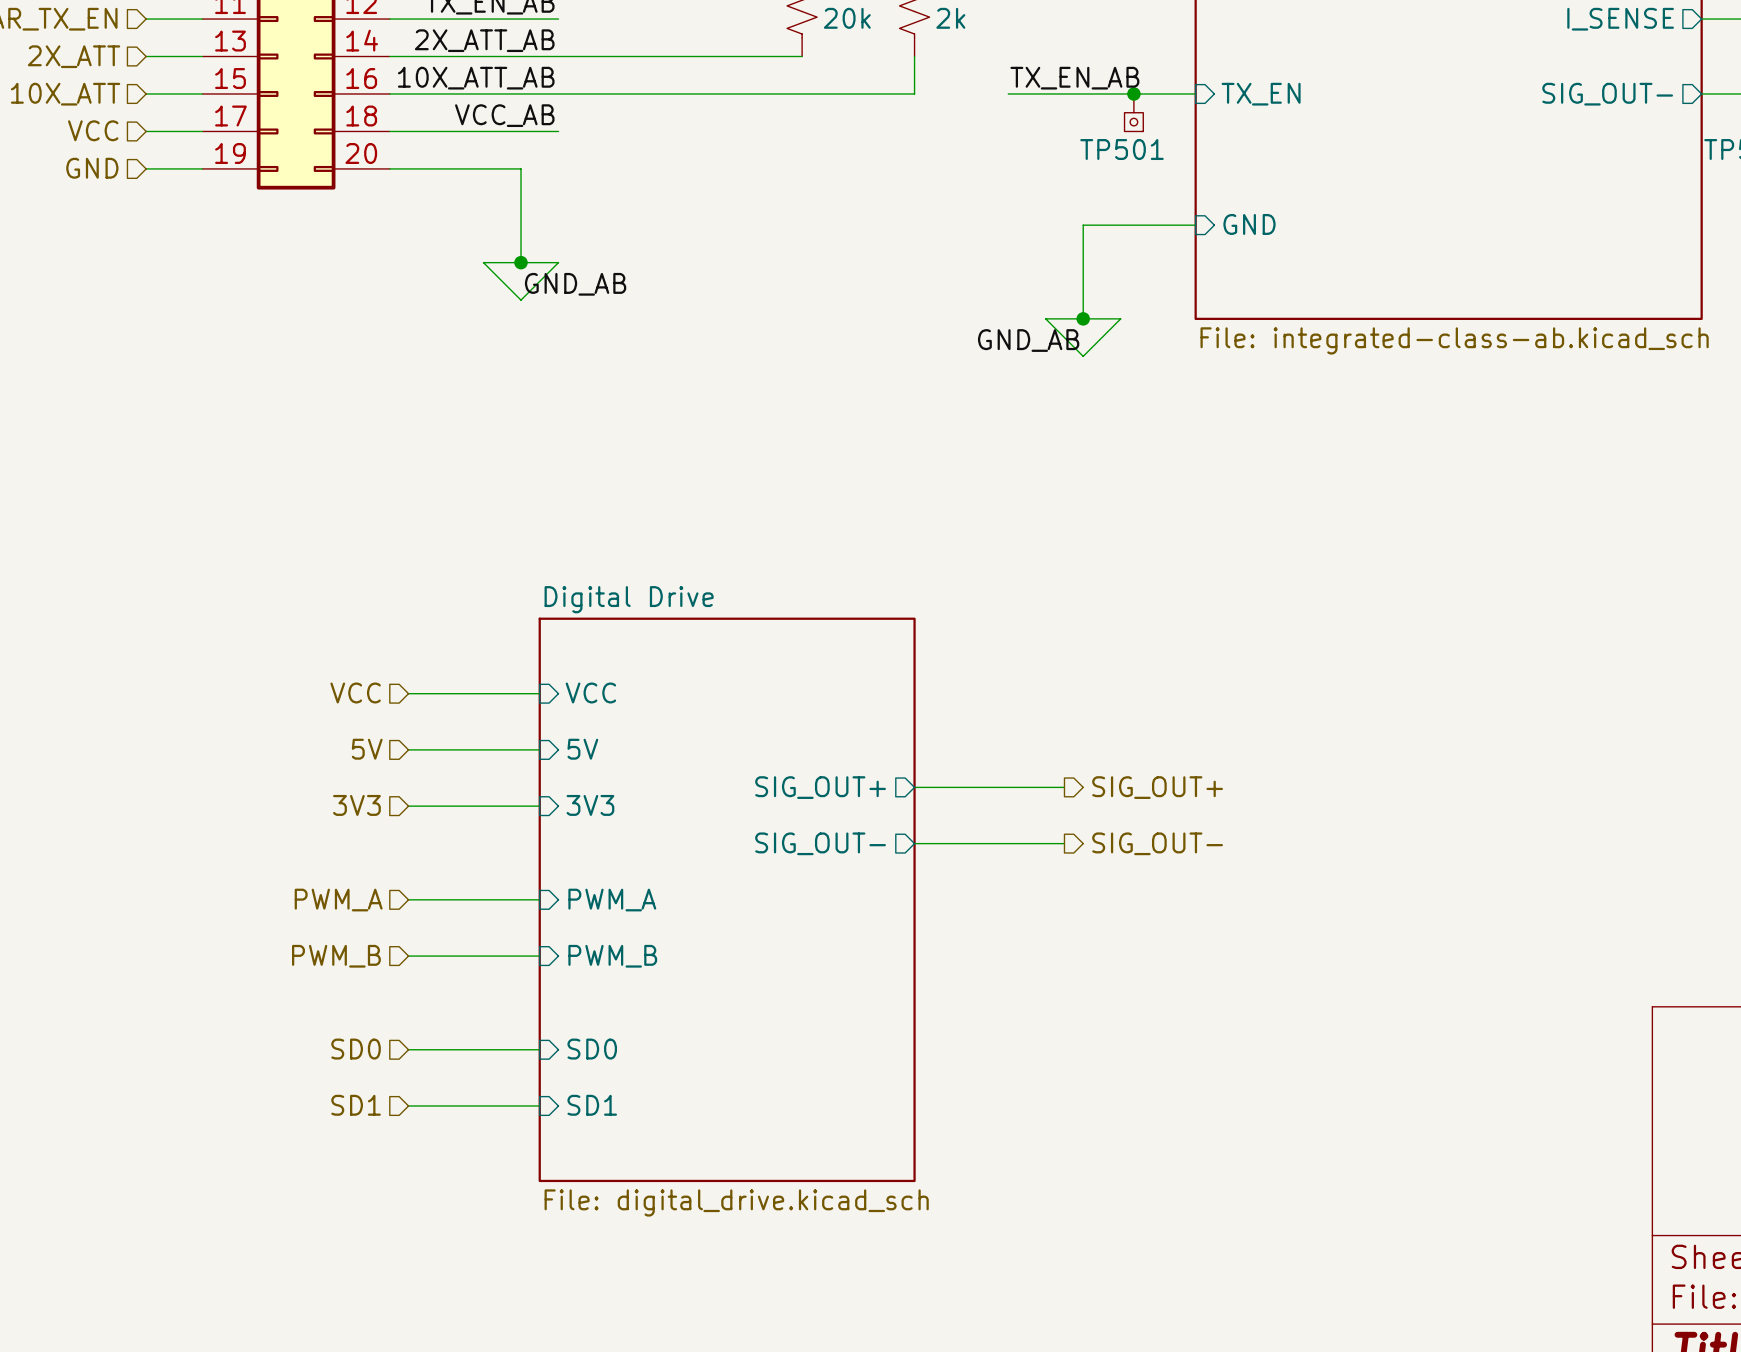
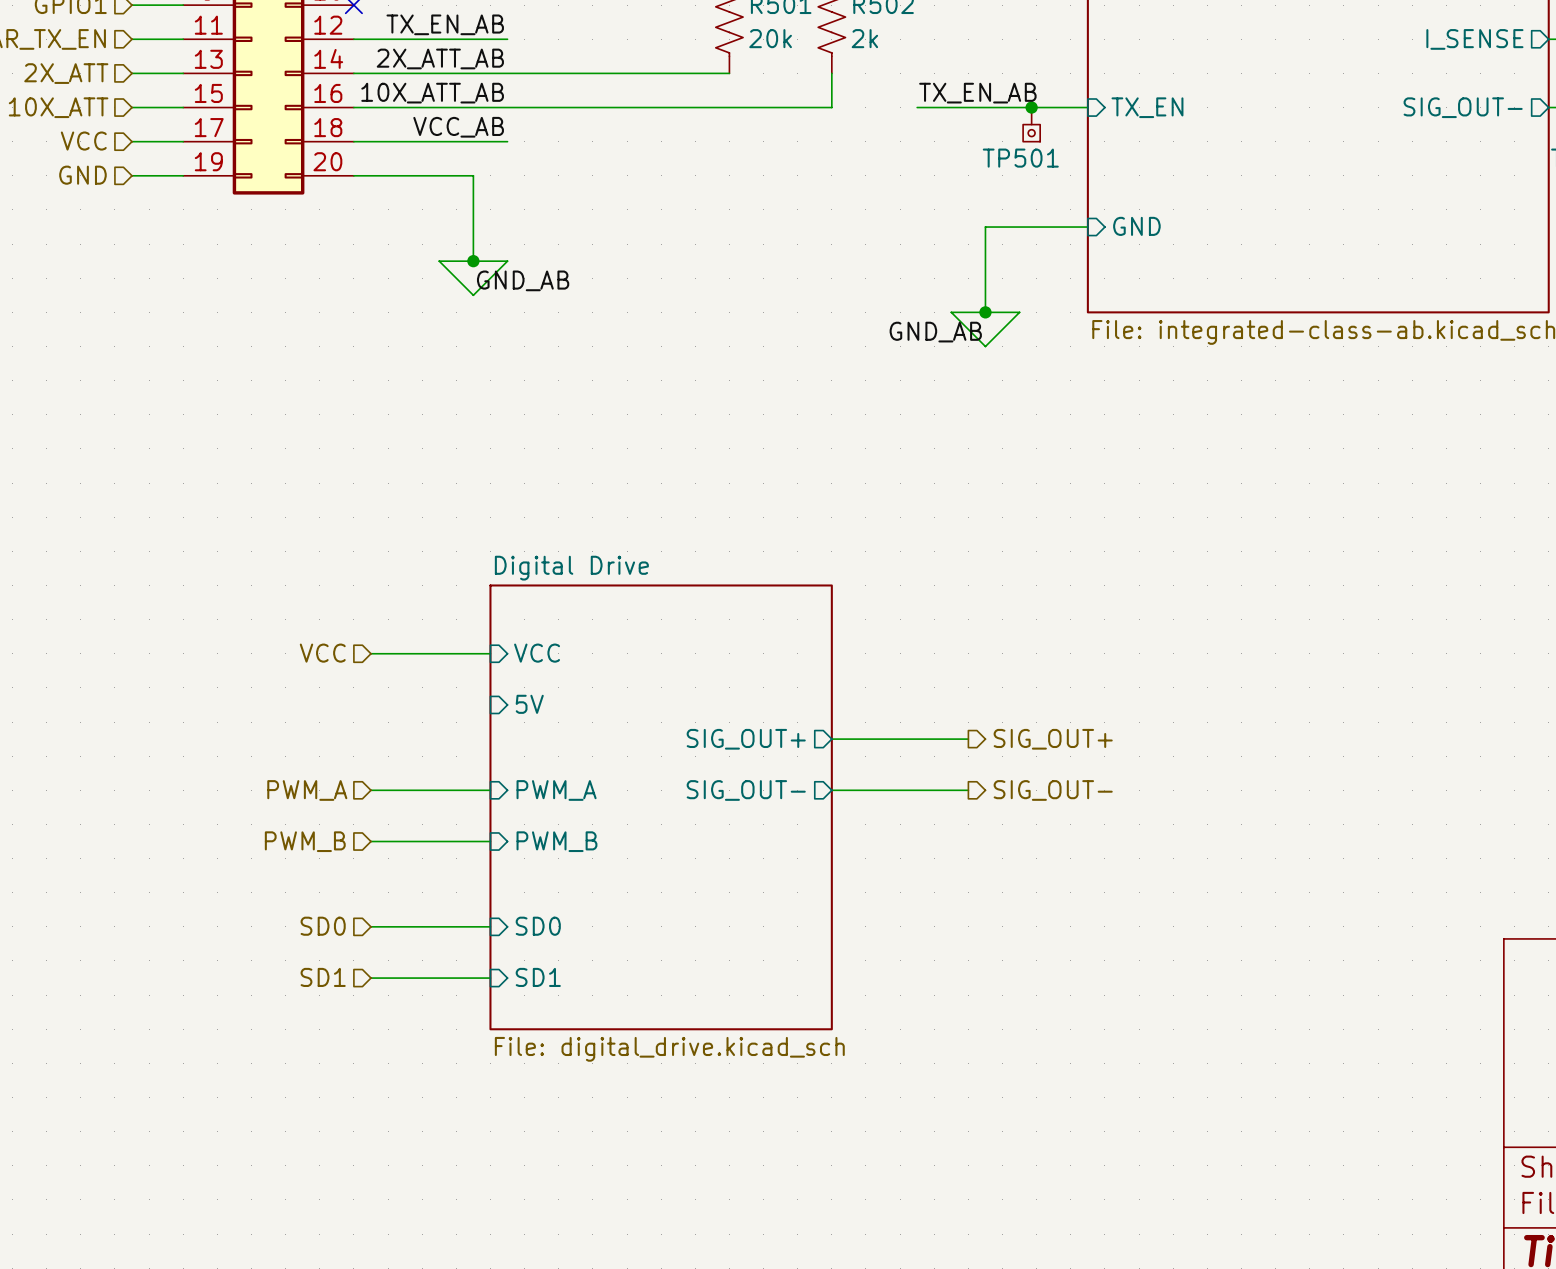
hierarchical label: 5V (367, 749) -> none
wire: (408, 749) (539, 749) -> none
hierarchical label: 3V3 (356, 805) -> none
sheet pin: 3V3 (590, 805) -> none
wire: (408, 806) (539, 806) -> (370, 790) (490, 790)
hierarchical label: none -> PWM_A (307, 790)
sheet pin: none -> PWM_A (556, 790)
sheet Digital Drive: none -> File: digital_drive.kicad_sch (661, 807)
sheet Digital Drive: File: digital_drive.kicad_sch (727, 899) -> none
hierarchical label: PWM_A (338, 900) -> PWM_B (305, 841)
sheet pin: PWM_A (612, 900) -> PWM_B (556, 841)
hierarchical label: PWM_B (336, 956) -> none
wire: (408, 956) (539, 956) -> (370, 926) (490, 926)
sheet pin: PWM_B (612, 956) -> none
hierarchical label: none -> SD0 (323, 926)
sheet pin: none -> SD0 (538, 926)
hierarchical label: SD0 (356, 1049) -> SD1 (323, 977)
sheet pin: SD0 (592, 1049) -> SD1 (538, 977)
hierarchical label: SD1 (356, 1105) -> none
wire: (408, 1105) (539, 1105) -> none
sheet pin: SD1 (592, 1105) -> none

